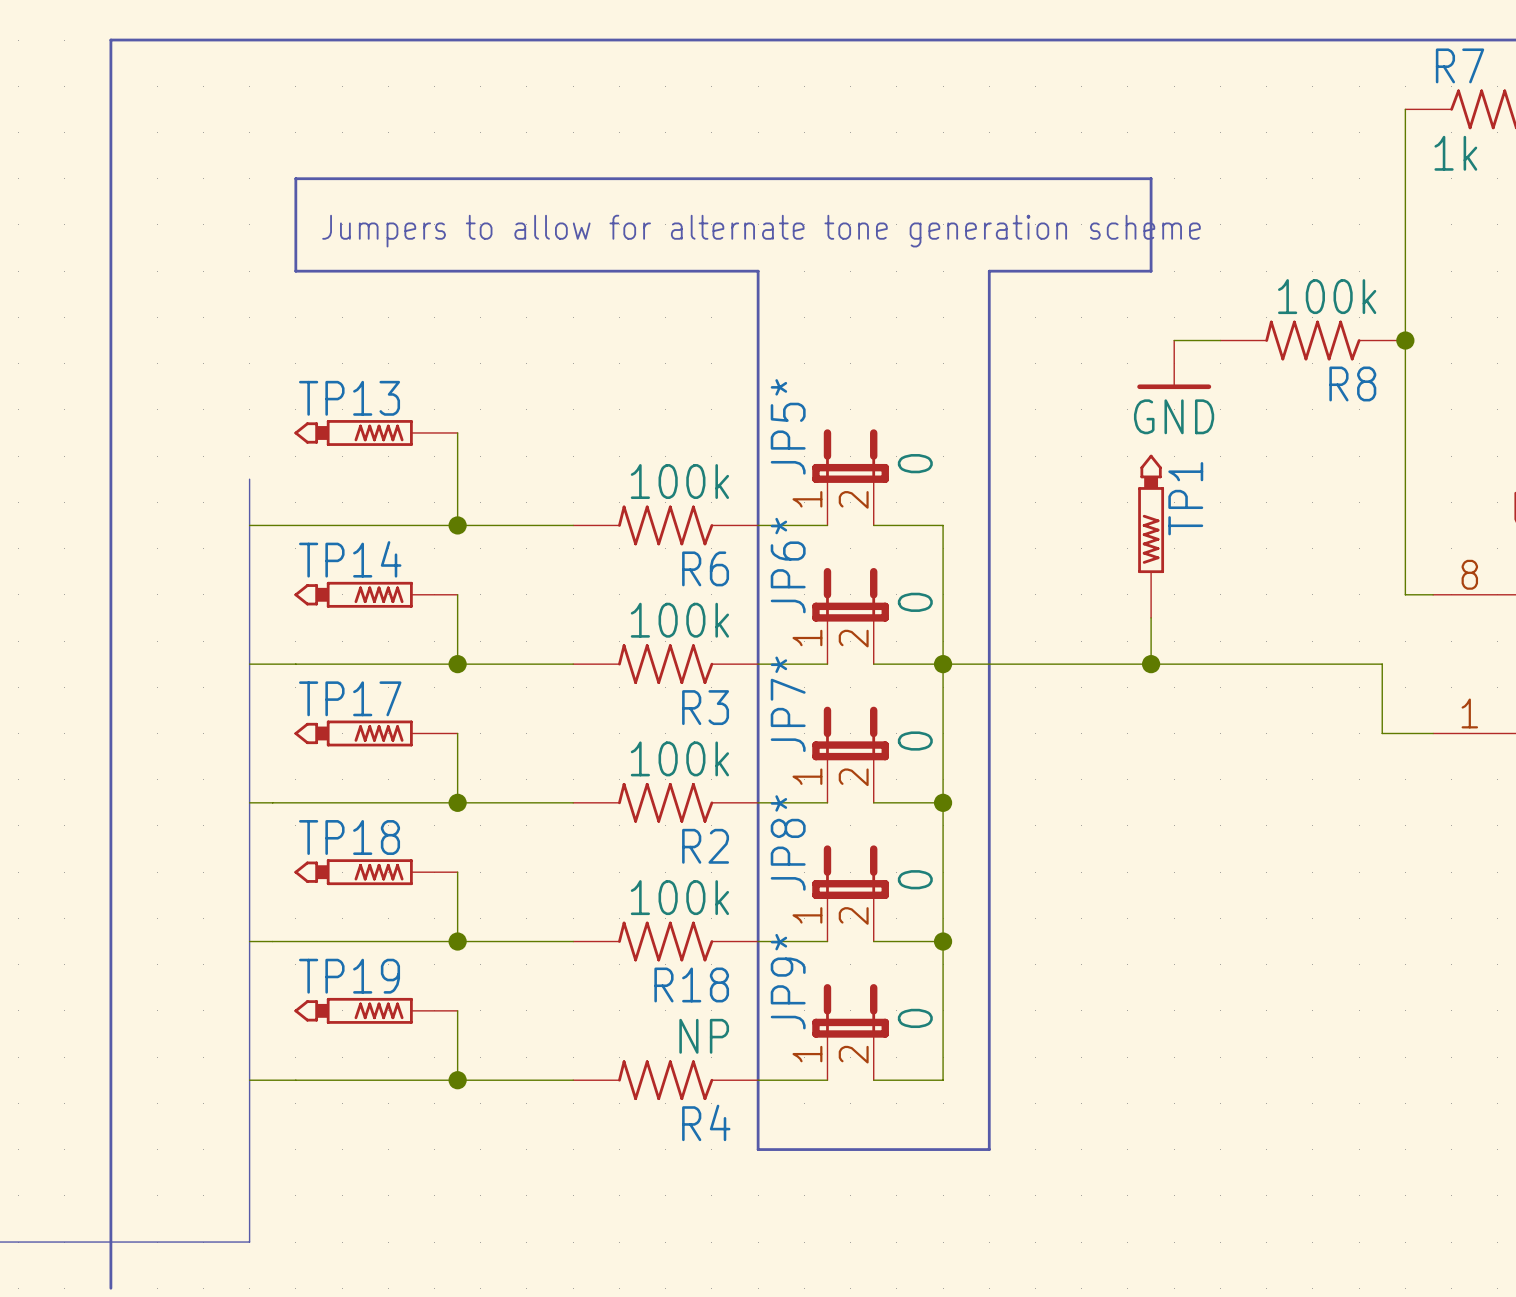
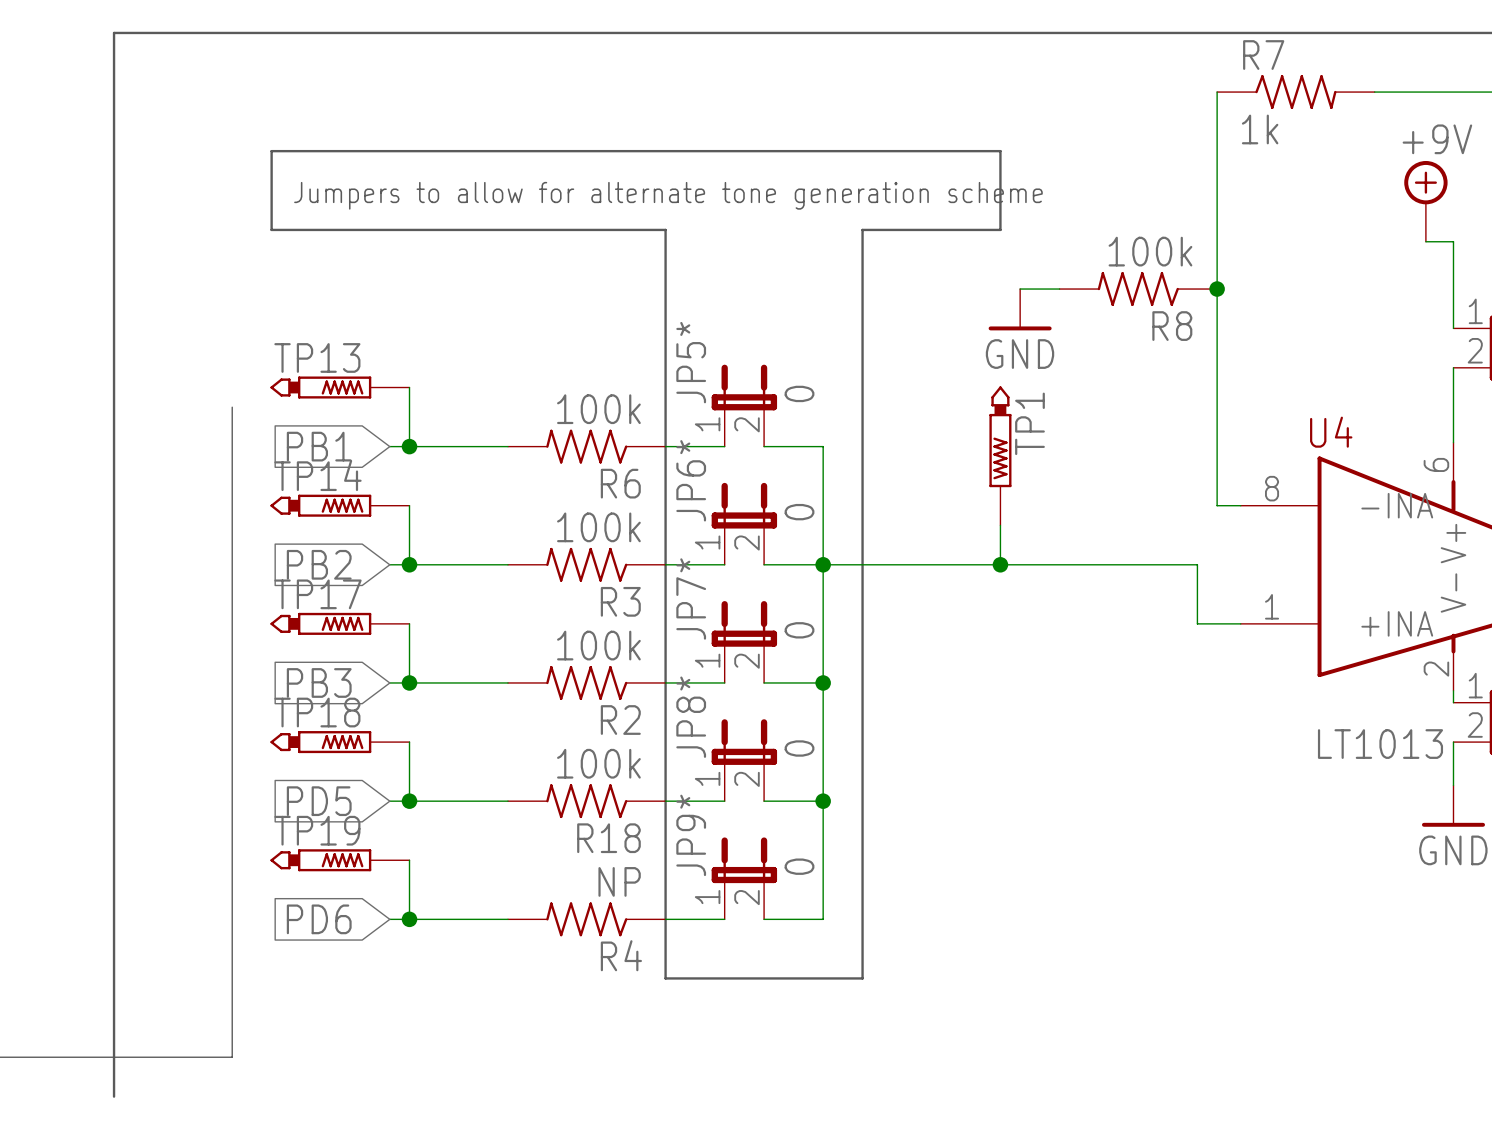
TP13 position: (376, 432) -> (339, 387)
wire: (457, 432) (457, 456) -> none
wire: (249, 525) (434, 525) -> none
global label: none -> PB1 (319, 446)
wire: (249, 664) (434, 664) -> none
global label: none -> PB2 (319, 564)
wire: (249, 802) (434, 802) -> none
global label: none -> PB3 (319, 682)
wire: (249, 941) (434, 941) -> none
global label: none -> PD5 (319, 801)
wire: (249, 1080) (434, 1080) -> none
global label: none -> PD6 (319, 919)

